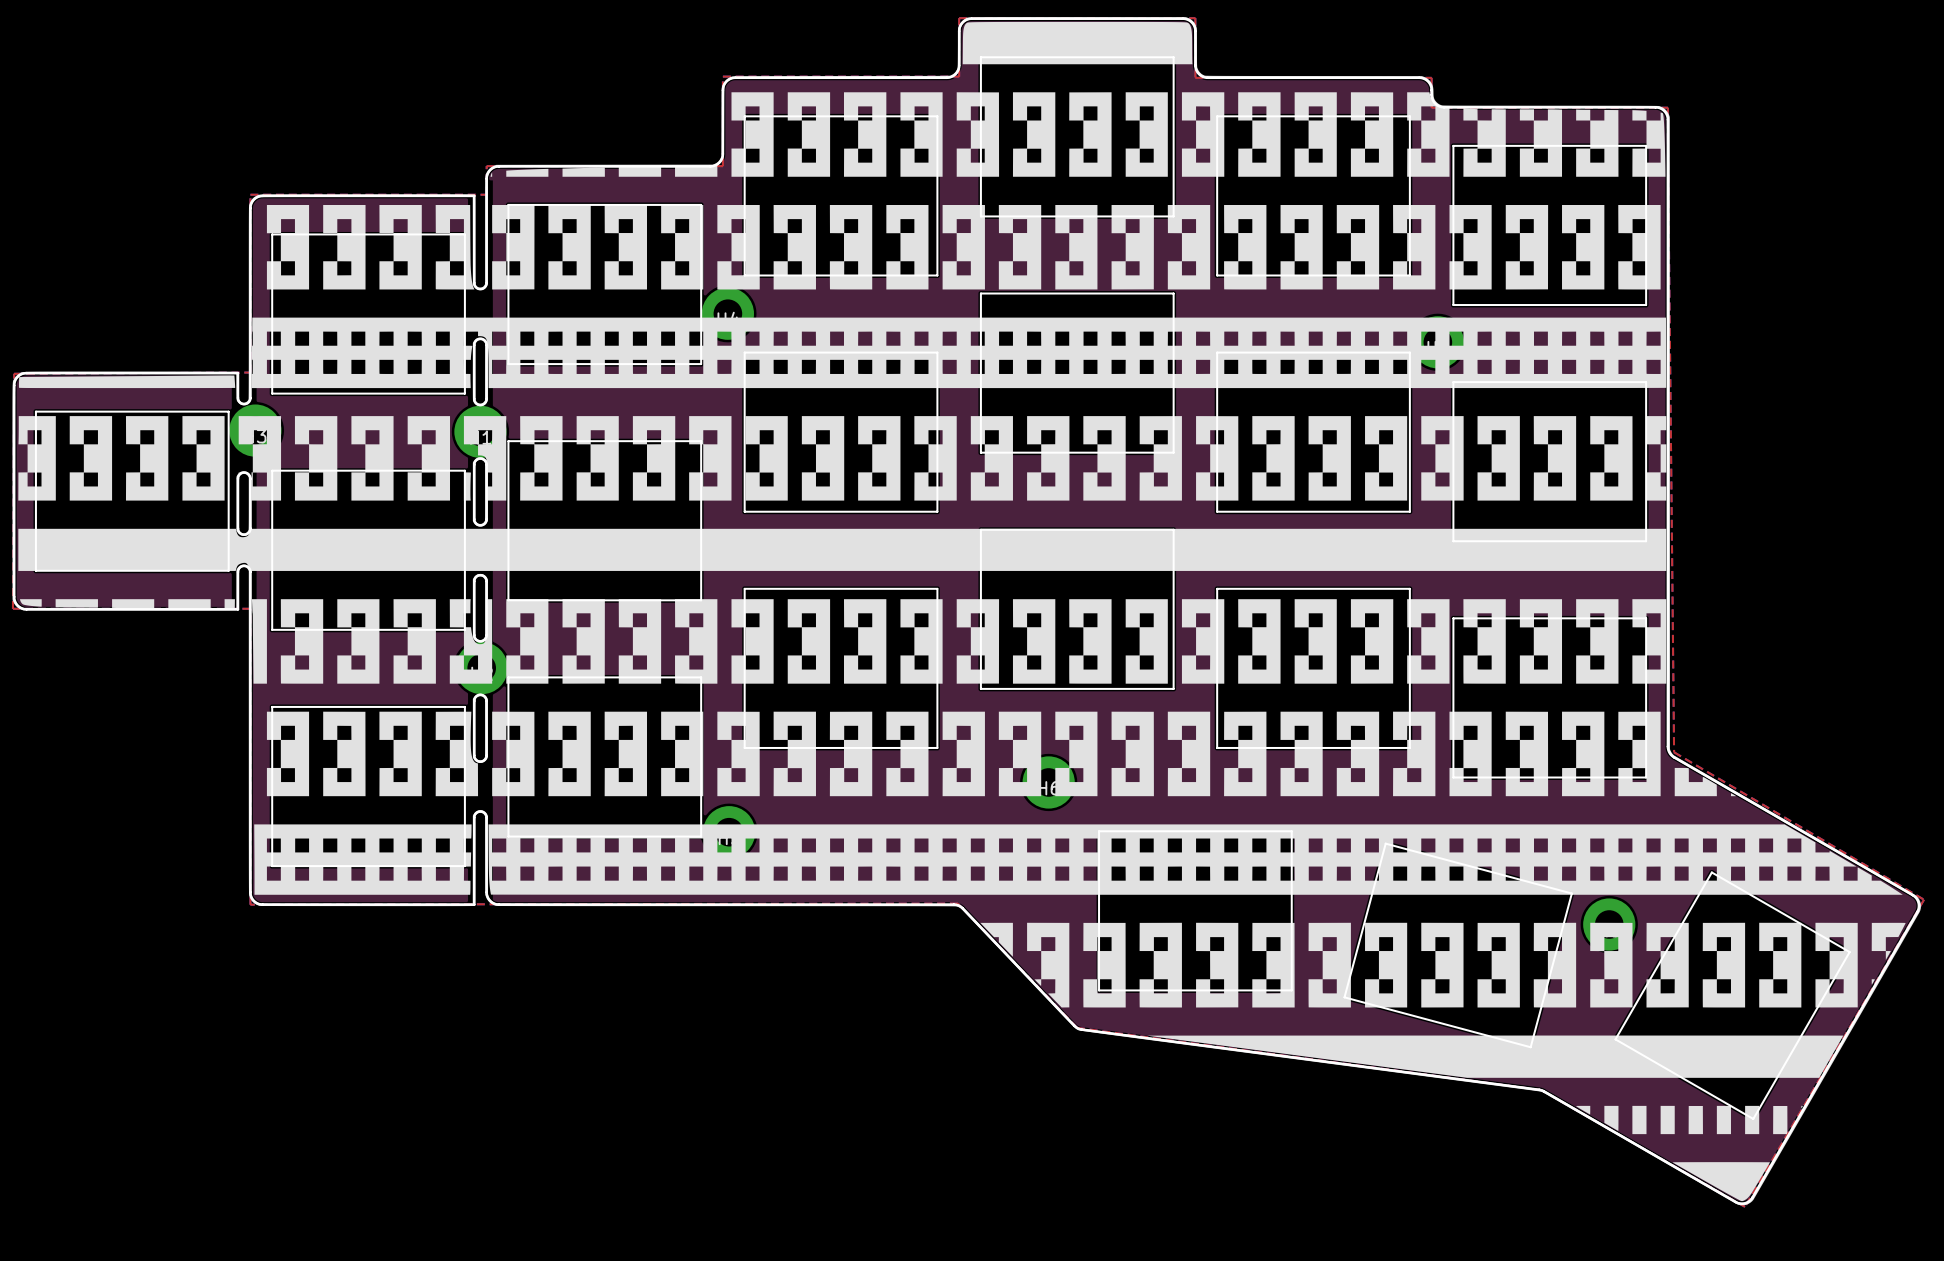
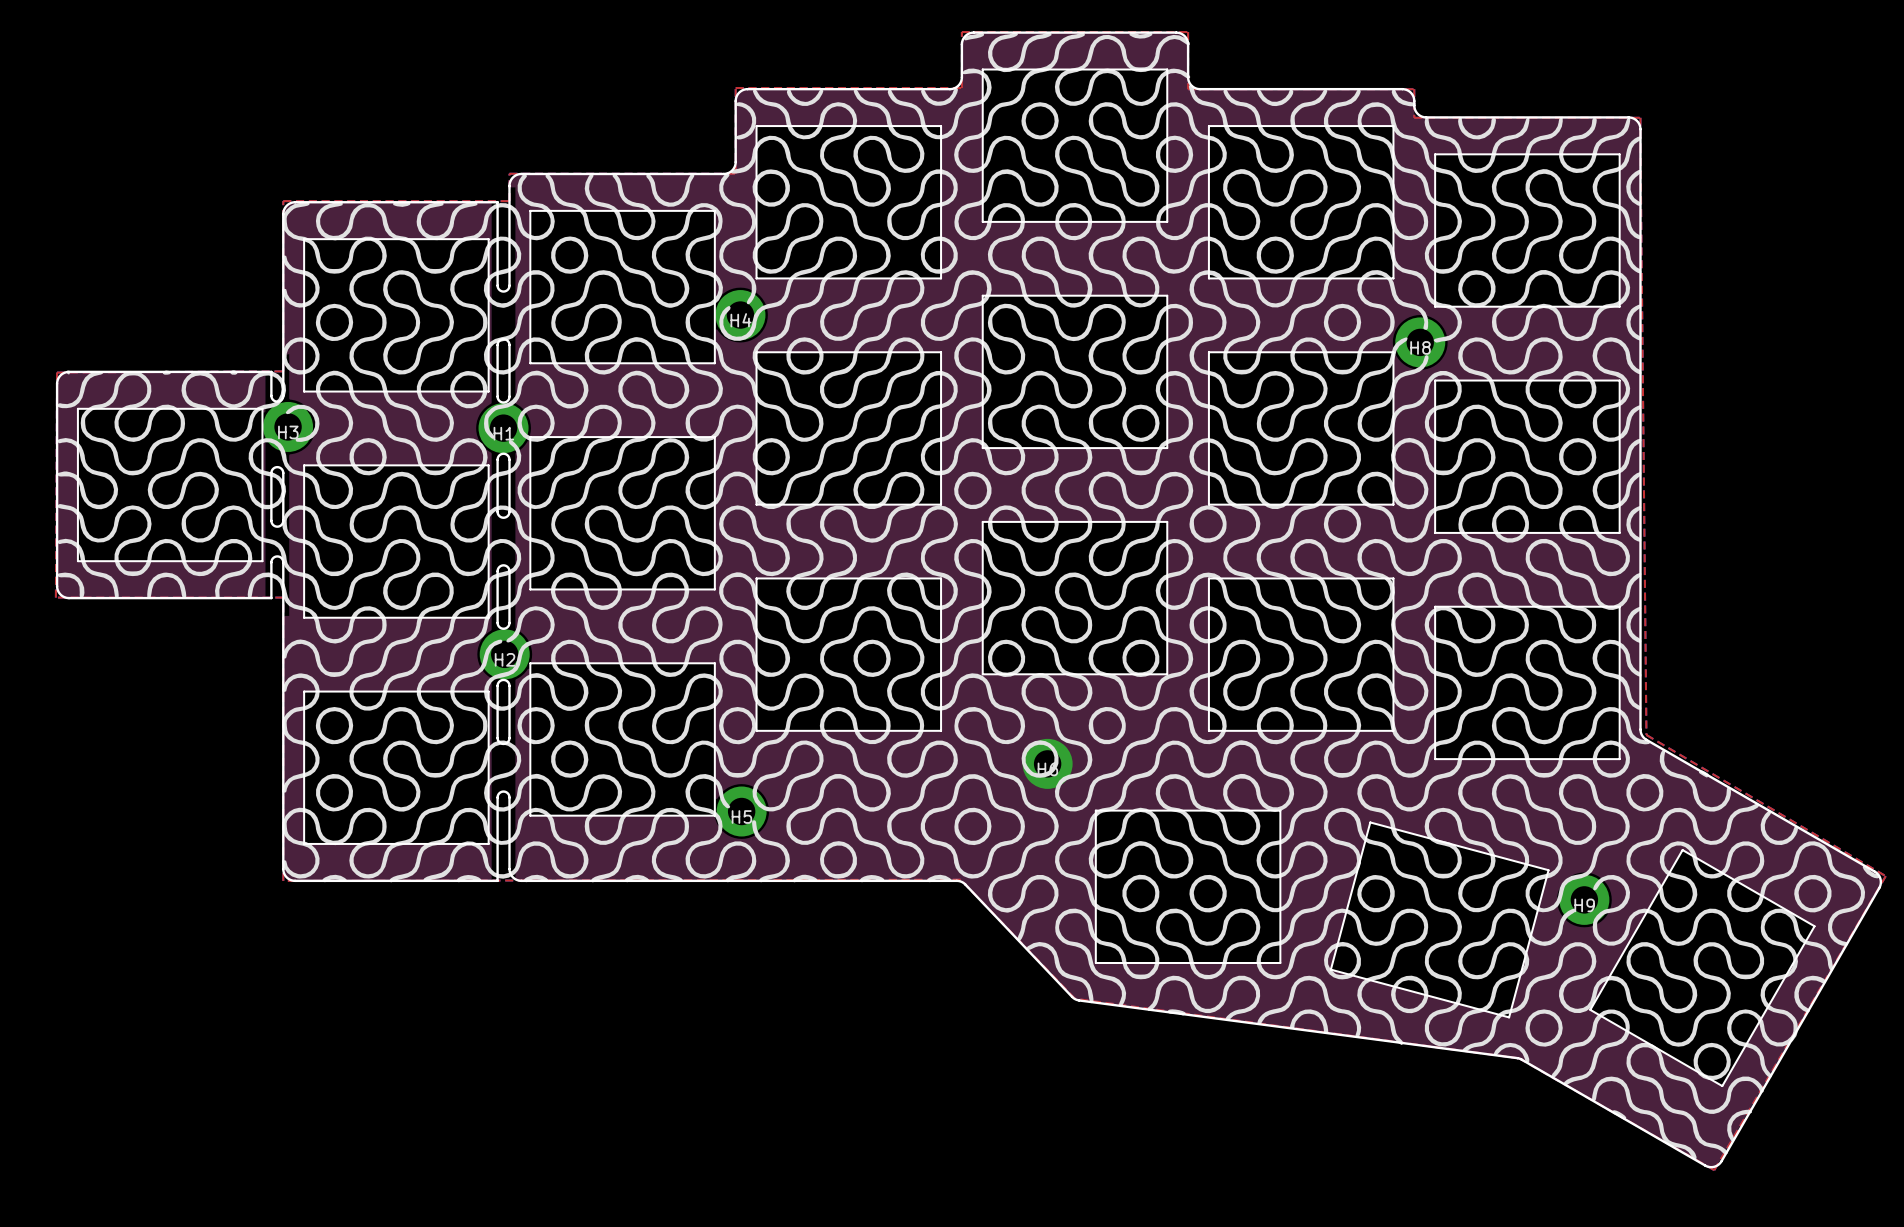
drawing shape: [12, 17, 1922, 1206] -> [57, 32, 1881, 1160]

